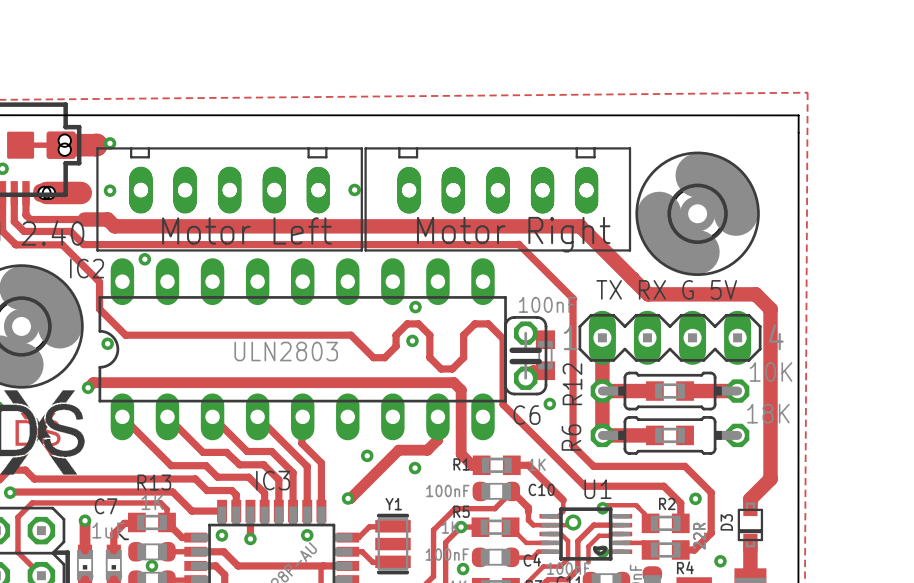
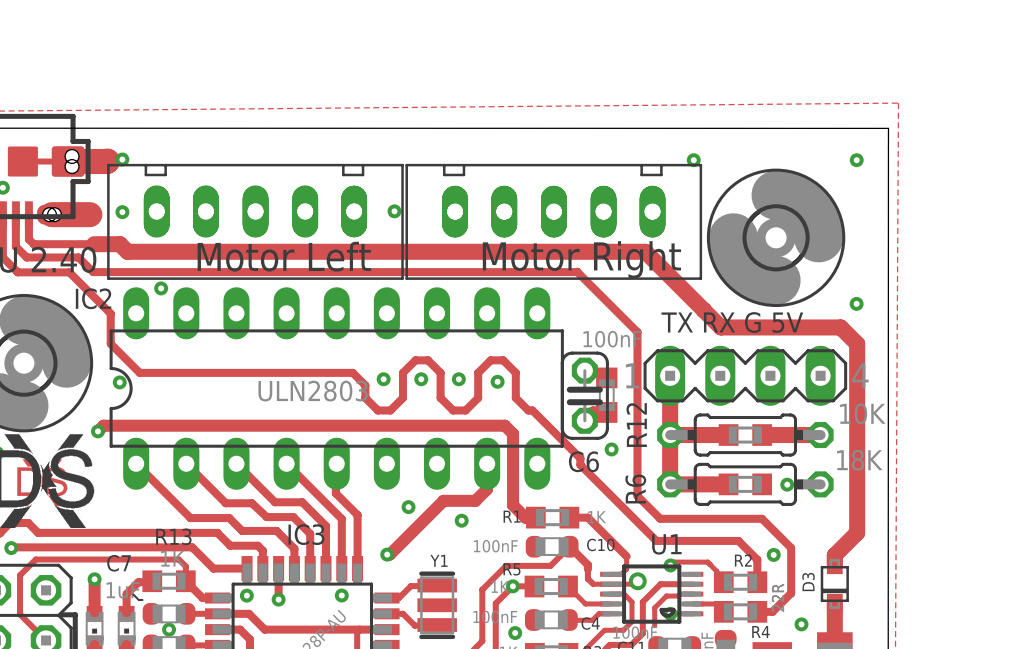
via: none -> (693, 160)
via: none -> (856, 160)
via: none -> (856, 303)
via: (415, 307) -> none
track: (317, 335) (350, 335) (373, 357) (384, 357) (396, 346) -> (352, 372) (365, 385) (365, 397) (377, 410) (390, 410) (402, 397) (402, 372) (415, 360) (428, 360) (440, 372)
track: (396, 335) (407, 323) (418, 323) (429, 335) -> (515, 372) (503, 360) (490, 360) (478, 372)
track: (463, 335) (474, 323) (488, 323) (503, 338) (503, 404) (584, 486) (590, 486) -> (515, 397) (528, 410) (532, 410) (580, 458) (580, 464) (656, 540)
via: none -> (383, 379)
via: none -> (421, 379)
via: none -> (497, 381)
track: (429, 357) (441, 368) (452, 368) (463, 357) -> (478, 397) (465, 410) (453, 410) (440, 397) (440, 385)
via: none -> (787, 484)

